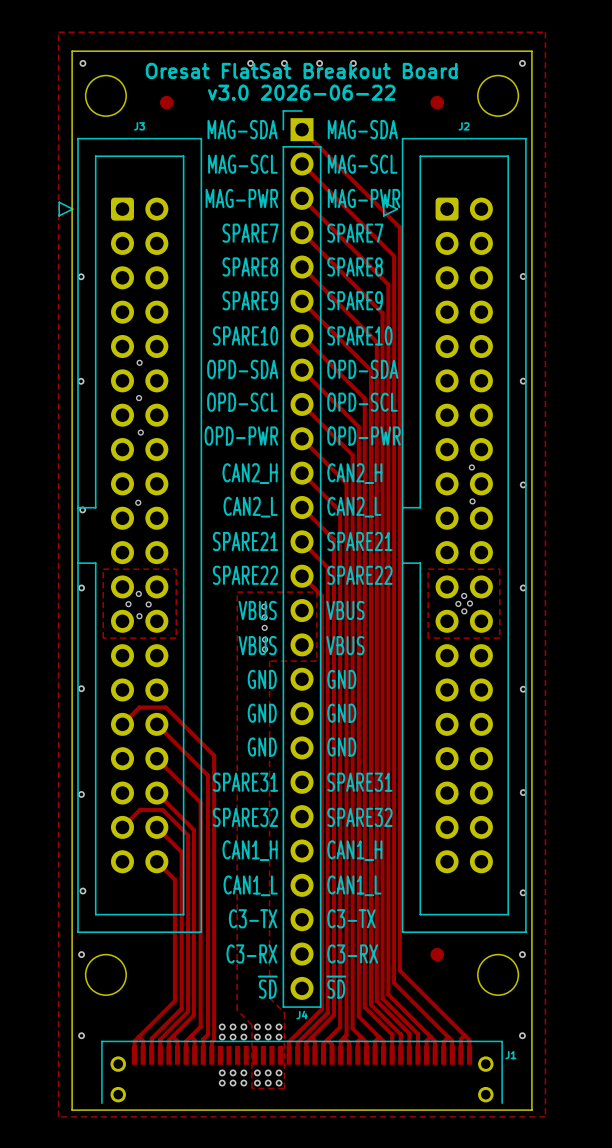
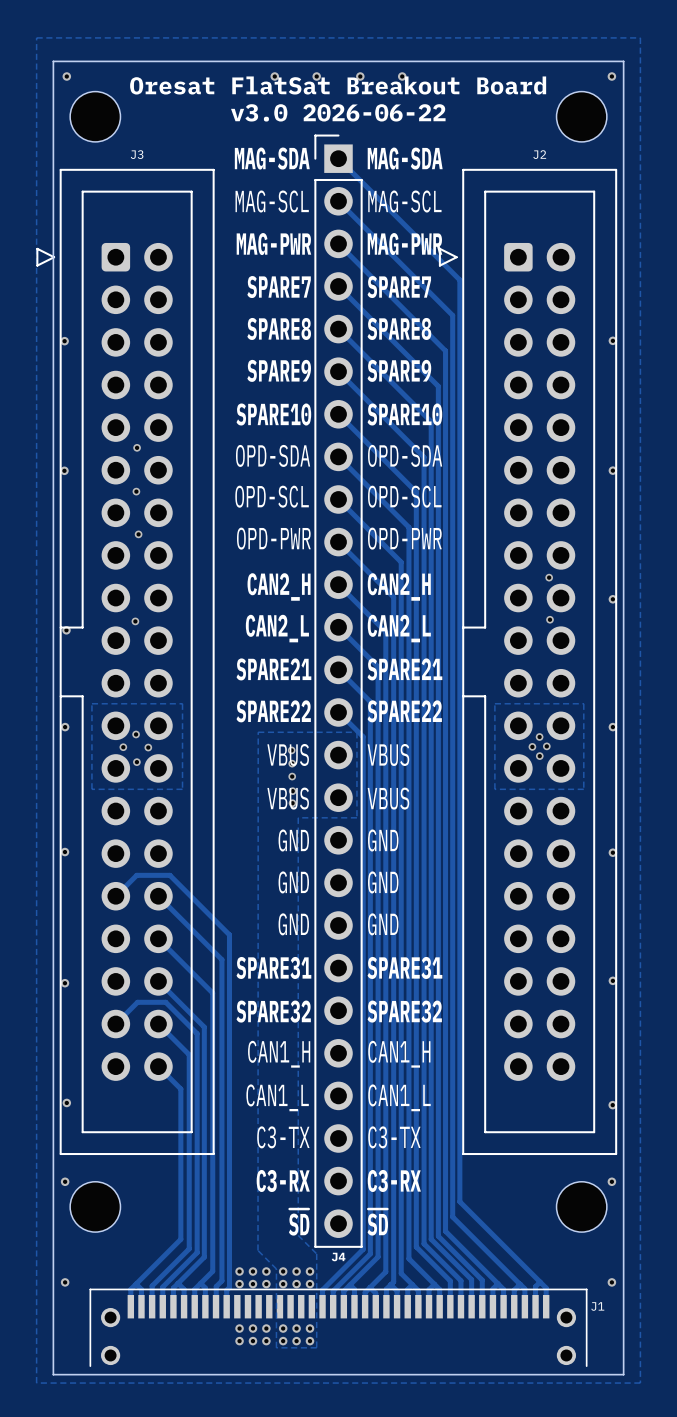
part: (166, 102) -> none
part: (437, 102) -> none
part: (437, 954) -> none

